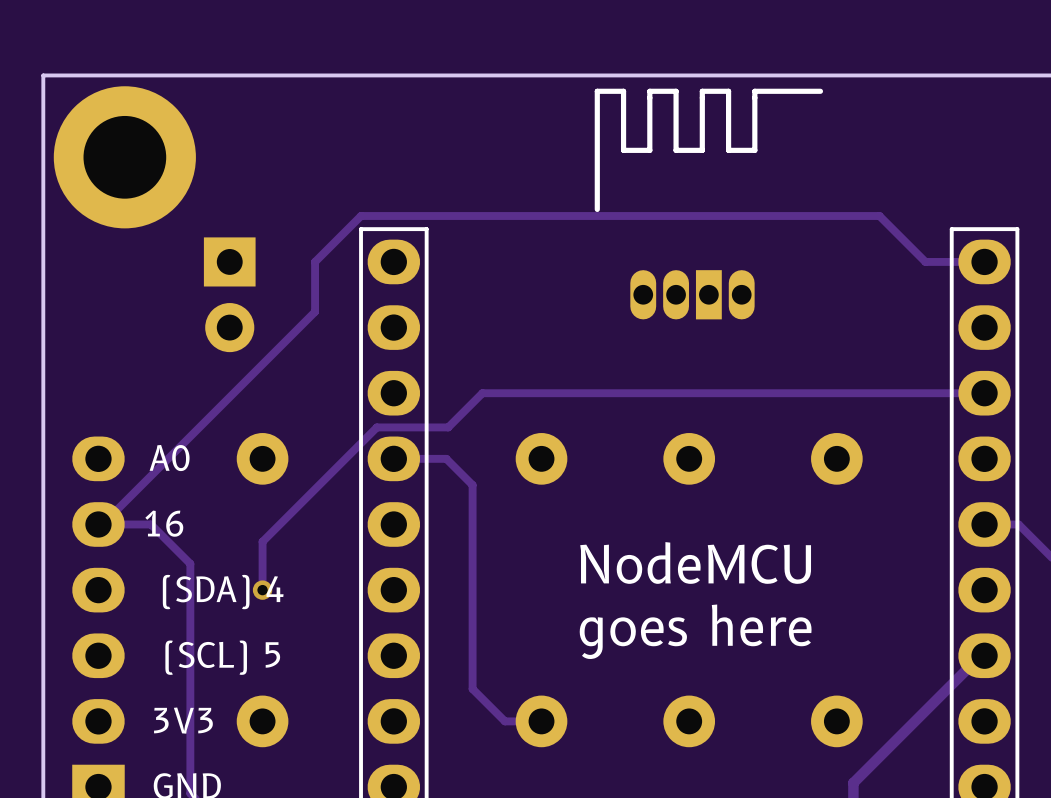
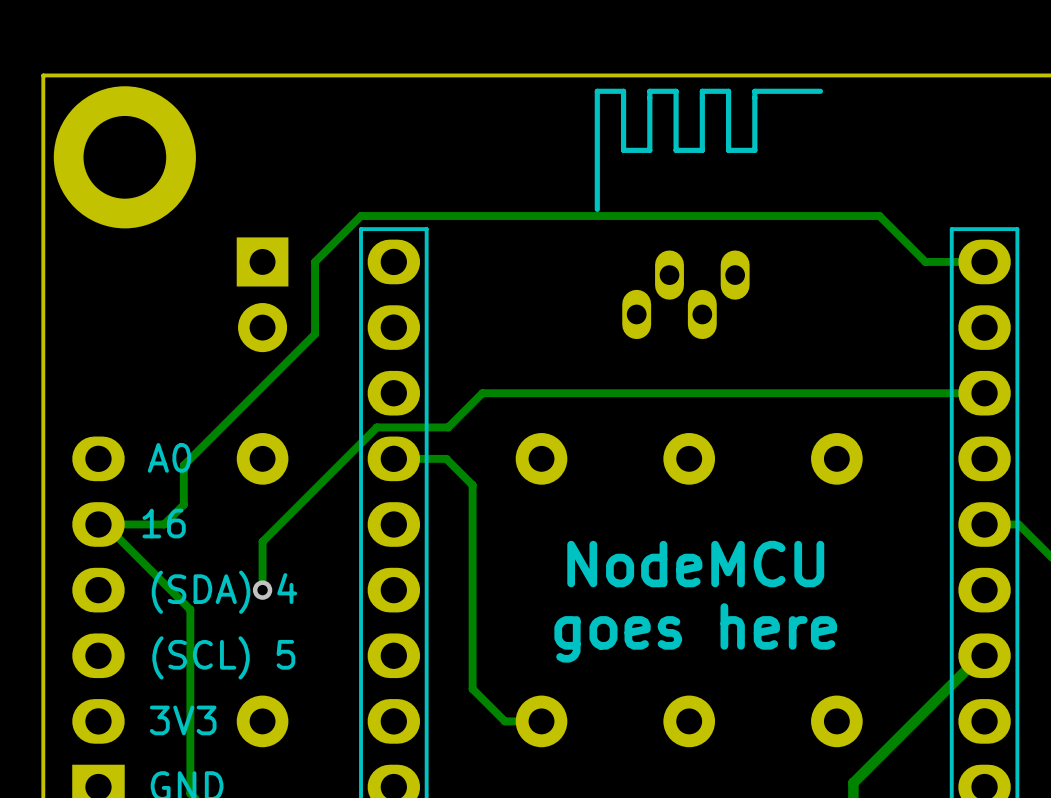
part footprint: [630, 270, 755, 320] -> [622, 250, 750, 340]
part position: (229, 294) -> (262, 294)
track: (315, 311) (102, 524) -> (315, 311) (315, 334) (183, 465) (183, 504) (164, 524) (150, 524)
track: (150, 524) (190, 563) (190, 609) -> (105, 524) (190, 609)

